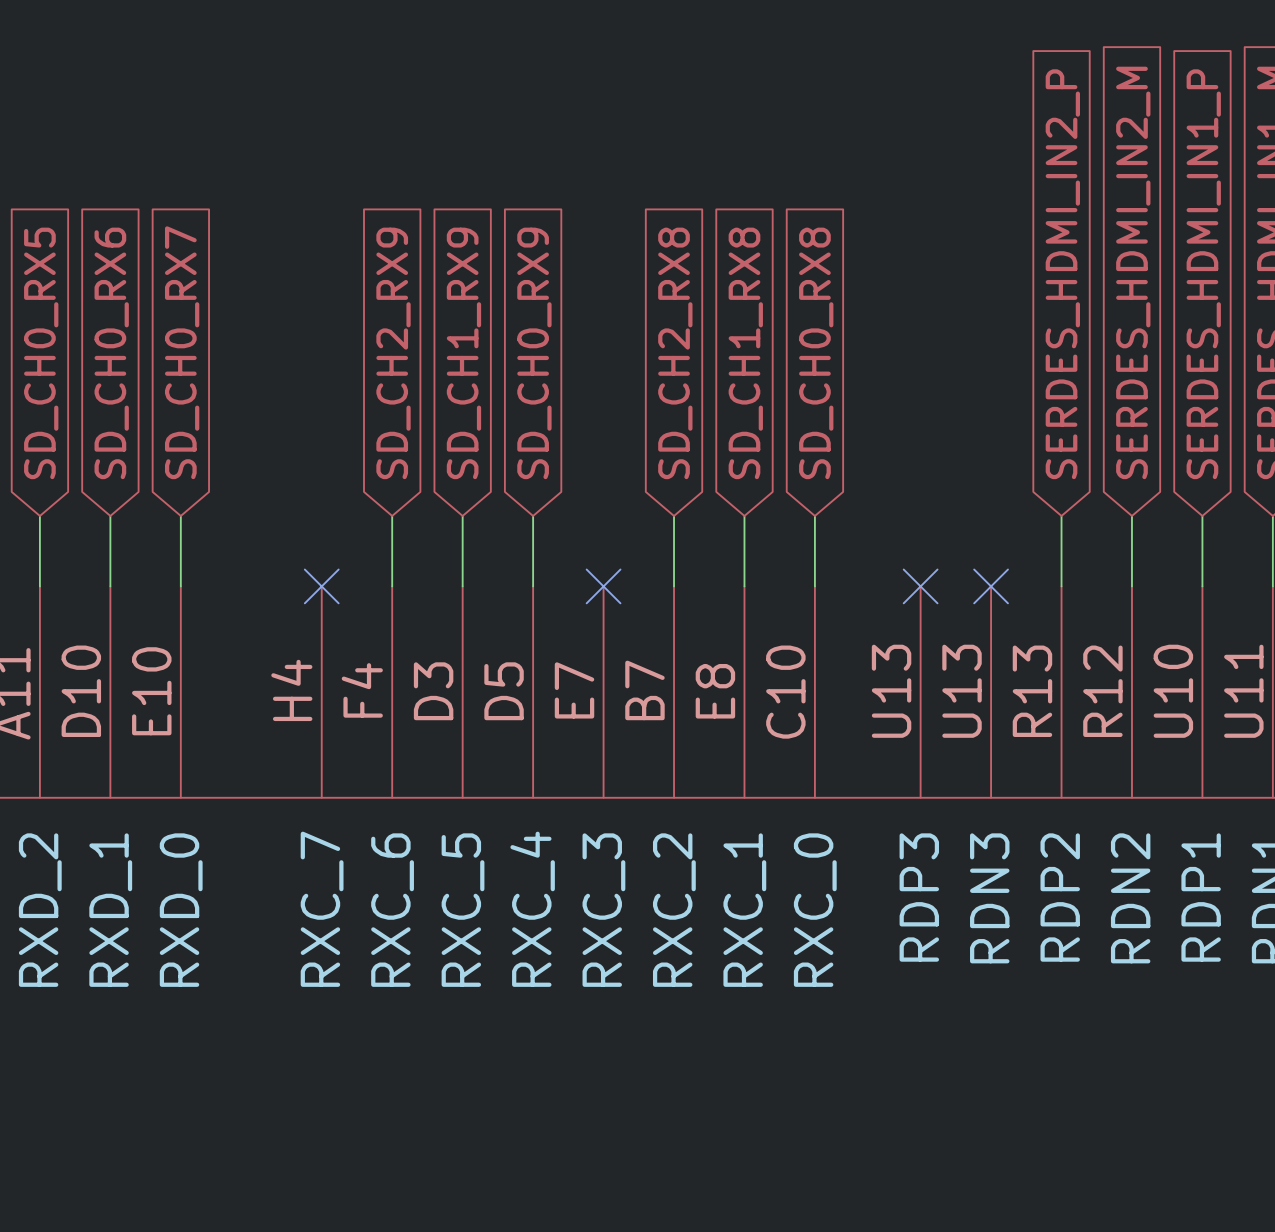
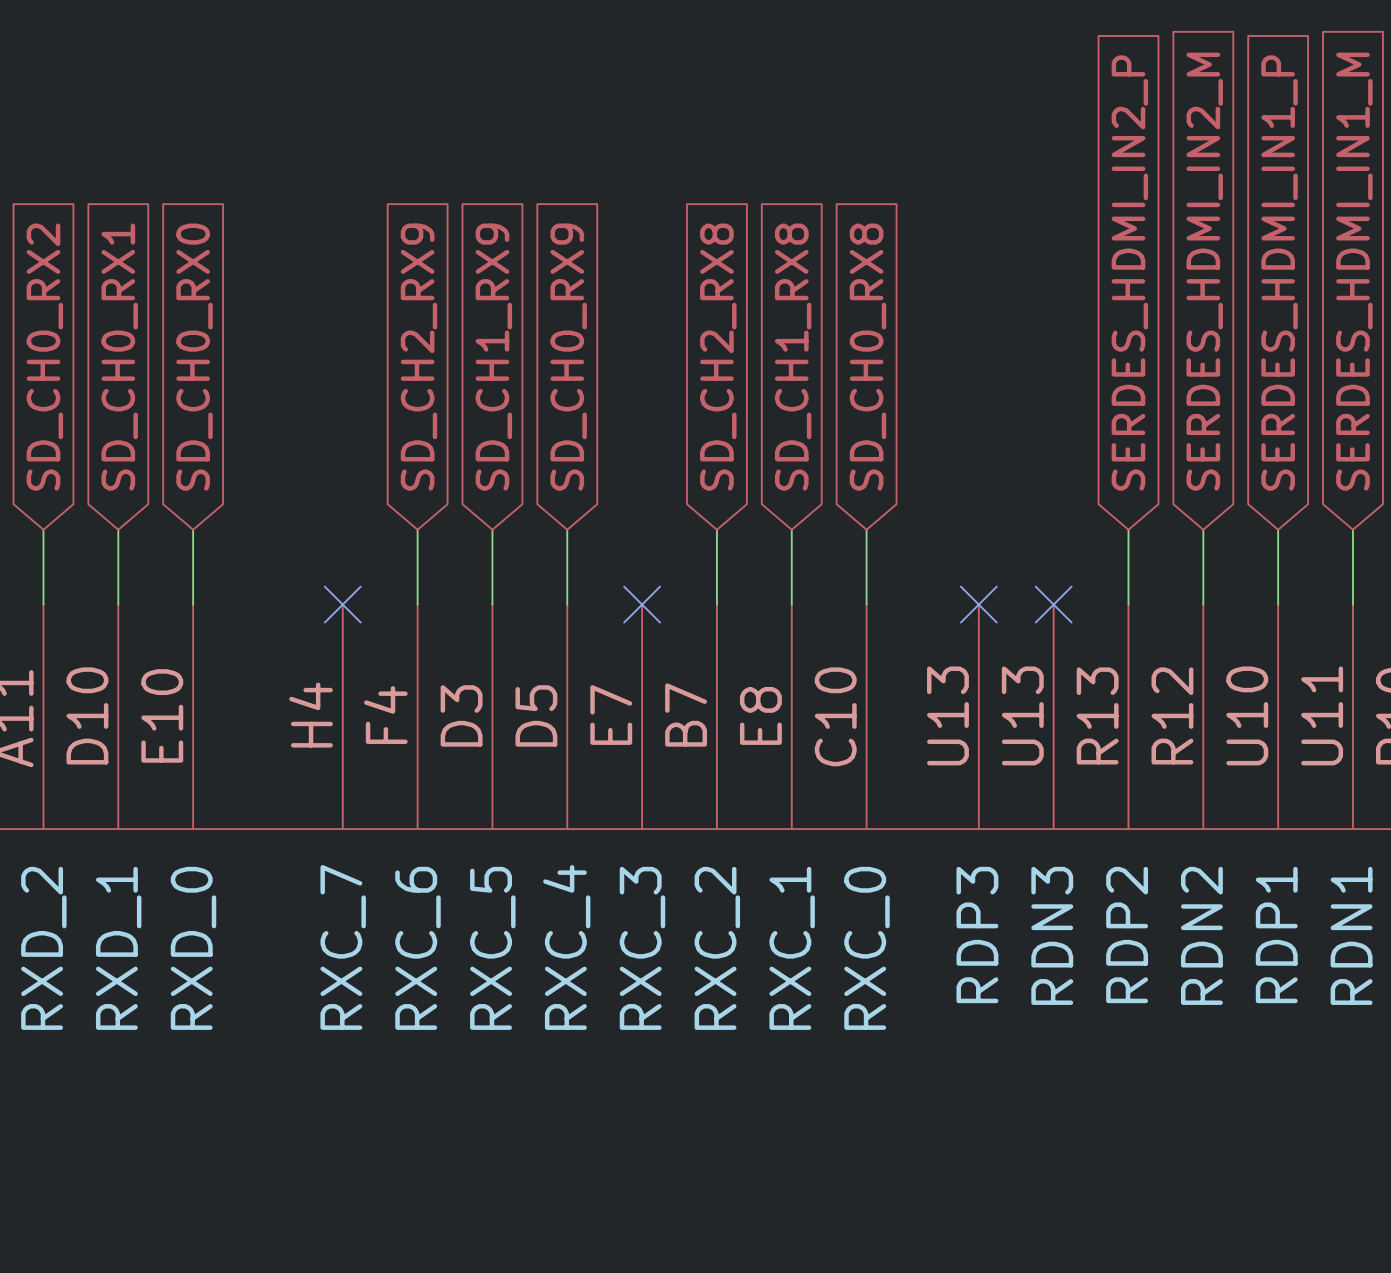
global label: SD_CH0_RX7 (182, 352) -> SD_CH0_RX0 (194, 357)
global label: SD_CH0_RX5 (41, 353) -> SD_CH0_RX2 (44, 357)
global label: SD_CH0_RX6 (111, 353) -> SD_CH0_RX1 (119, 357)

